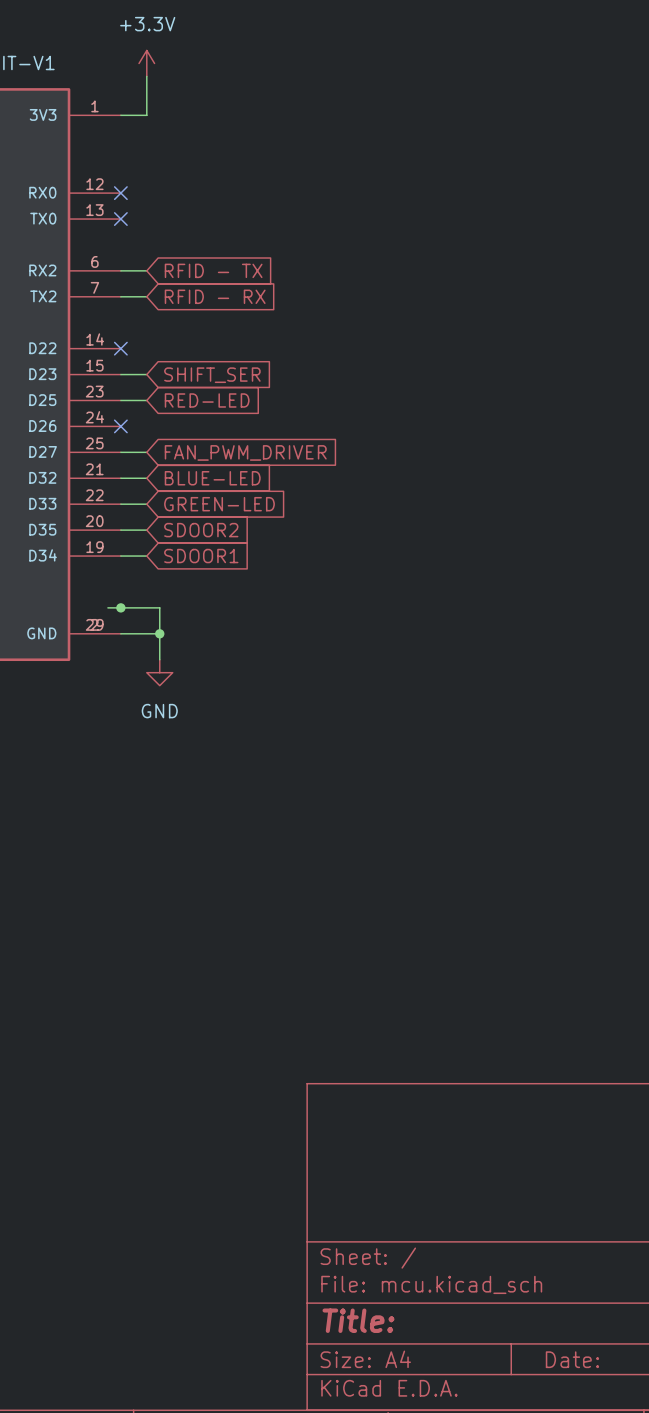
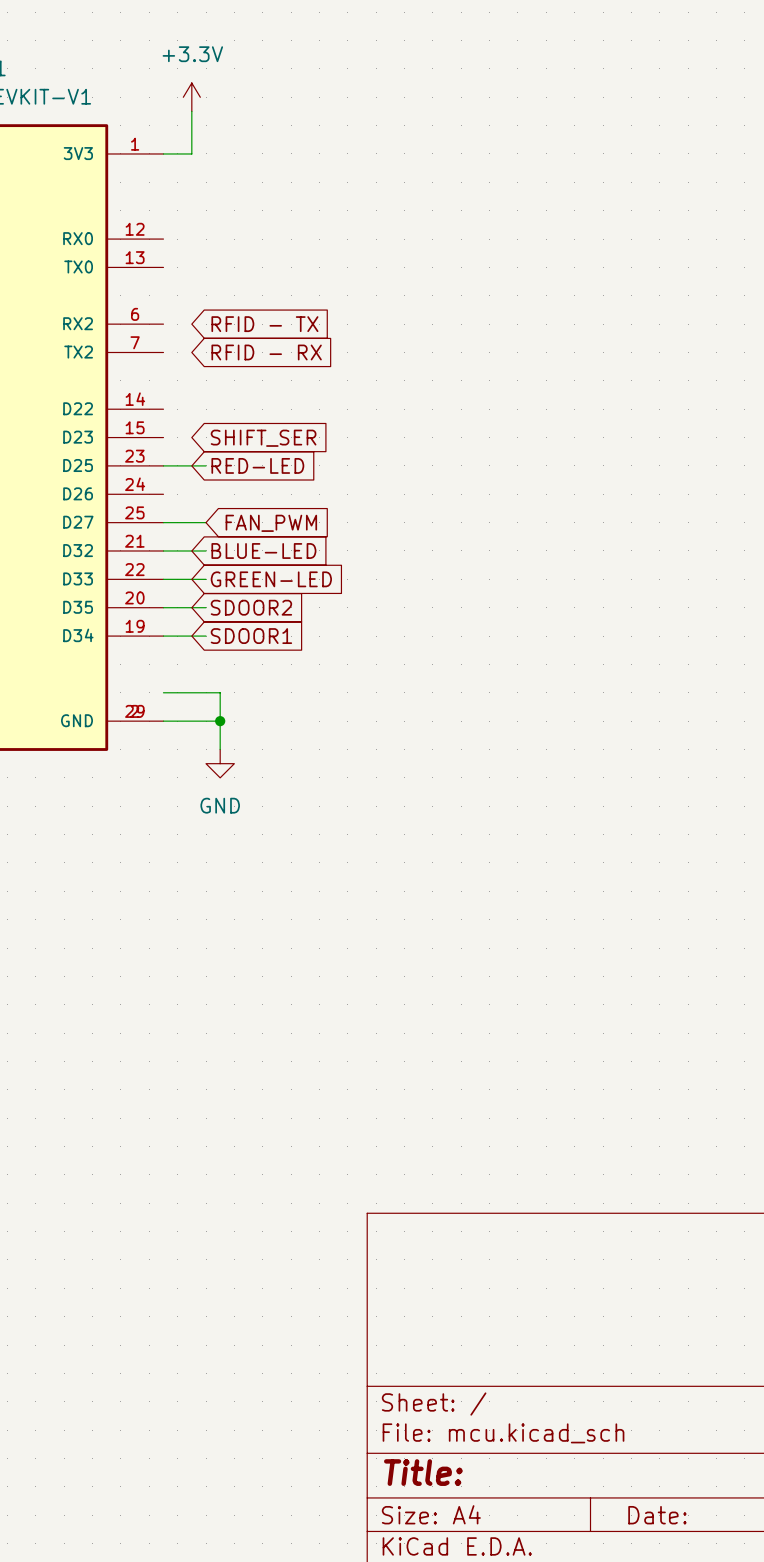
no-connect mark: (120, 193) -> none
no-connect mark: (120, 219) -> none
wire: (120, 270) (146, 270) -> none
wire: (120, 296) (146, 296) -> none
no-connect mark: (120, 348) -> none
wire: (120, 374) (146, 374) -> none
wire: none -> (191, 465) (206, 465)
no-connect mark: (120, 426) -> none
wire: none -> (191, 522) (206, 522)
global label: FAN_PWM_DRIVER (245, 452) -> FAN_PWM (271, 523)
wire: none -> (191, 550) (206, 550)
wire: none -> (191, 579) (206, 579)
wire: none -> (191, 607) (206, 607)
wire: none -> (191, 636) (206, 636)
wire: (107, 607) (120, 607) -> (206, 721) (220, 721)
junction: (120, 607) -> none
wire: (159, 607) (159, 659) -> (206, 692) (220, 692) (220, 749)
junction position: (159, 633) -> (220, 721)
power symbol position: GND (159, 672) -> GND (220, 763)

